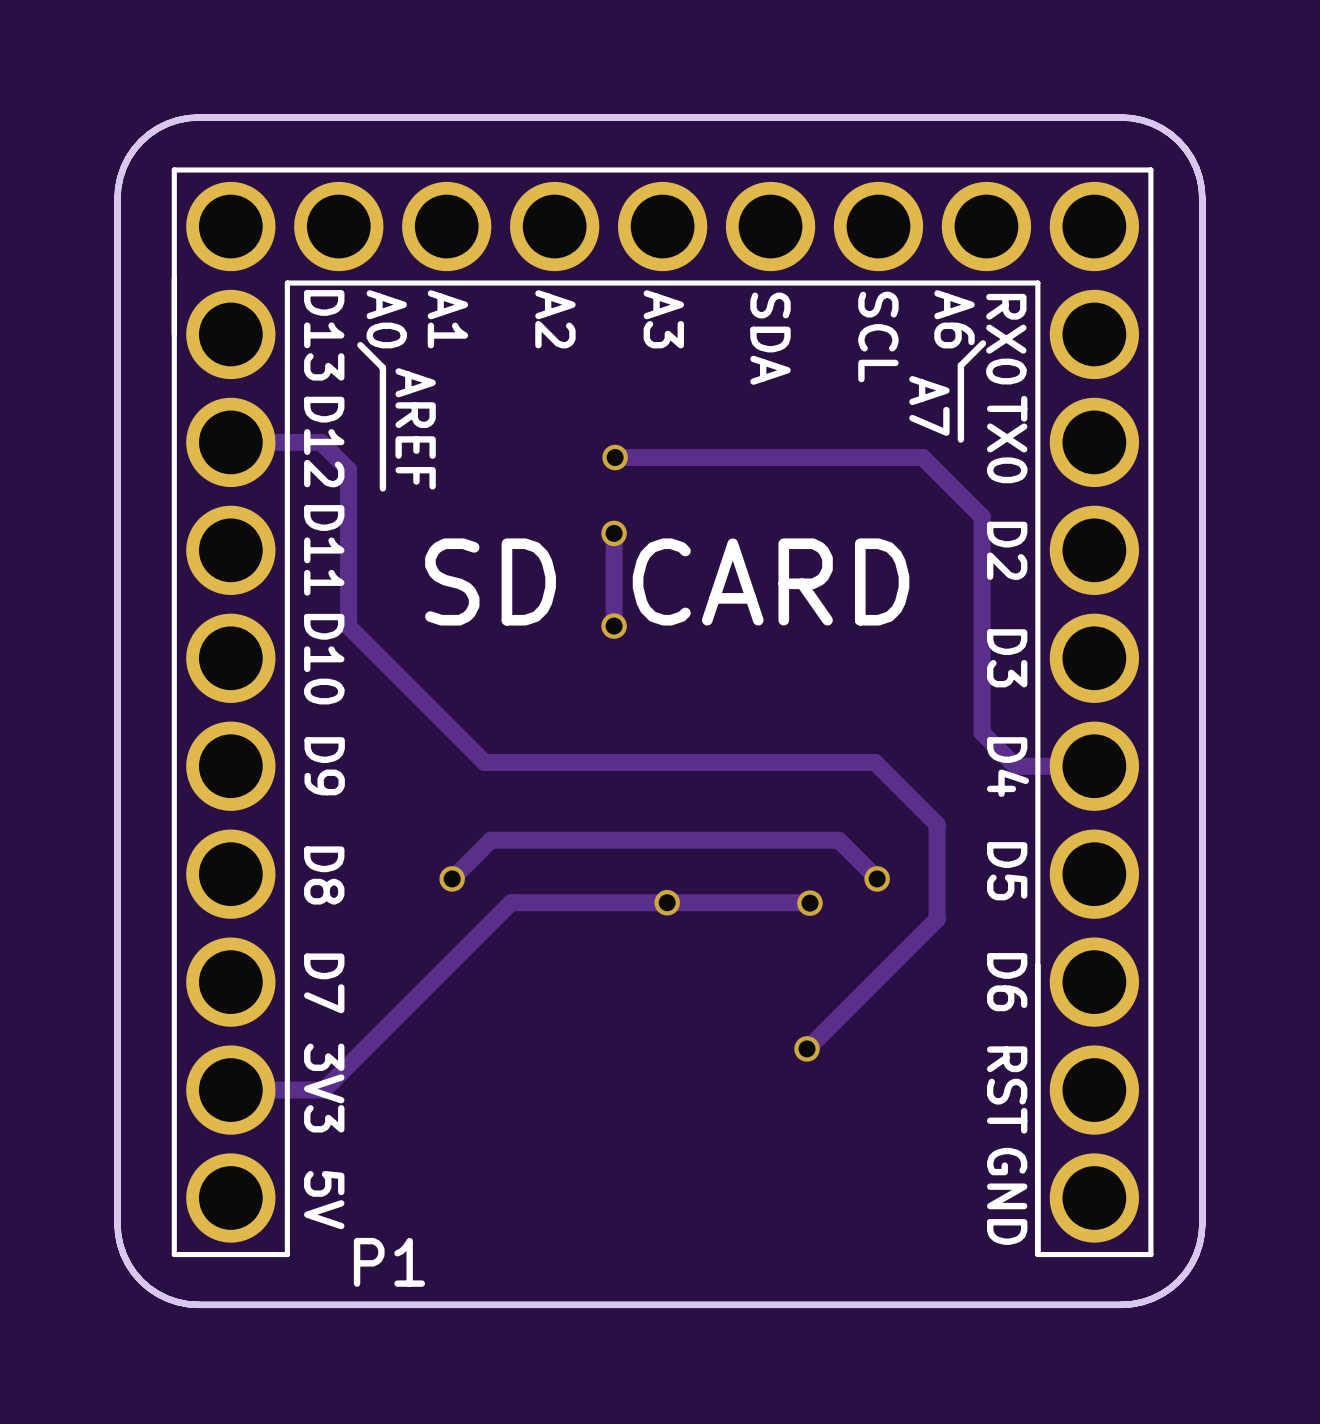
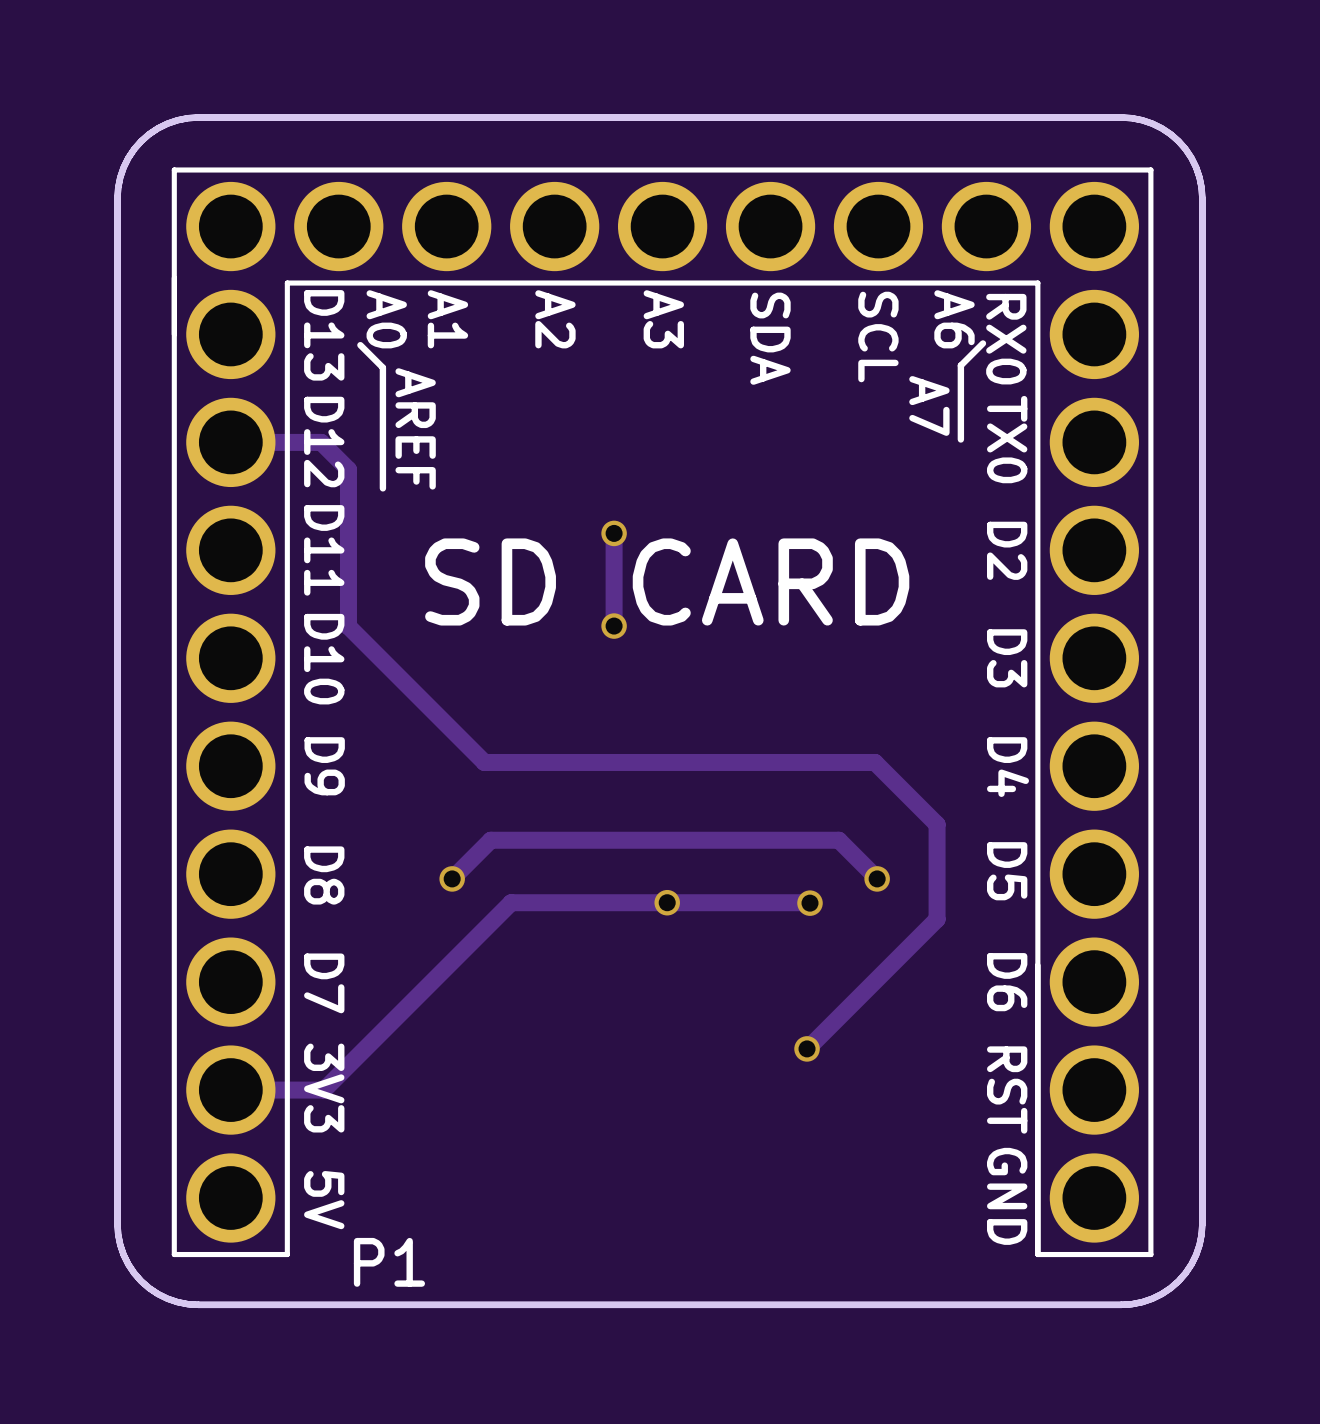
track: (615, 457) (922, 457) (982, 516) (982, 732) (1015, 766) (1094, 766) -> none
via: (615, 457) -> none

